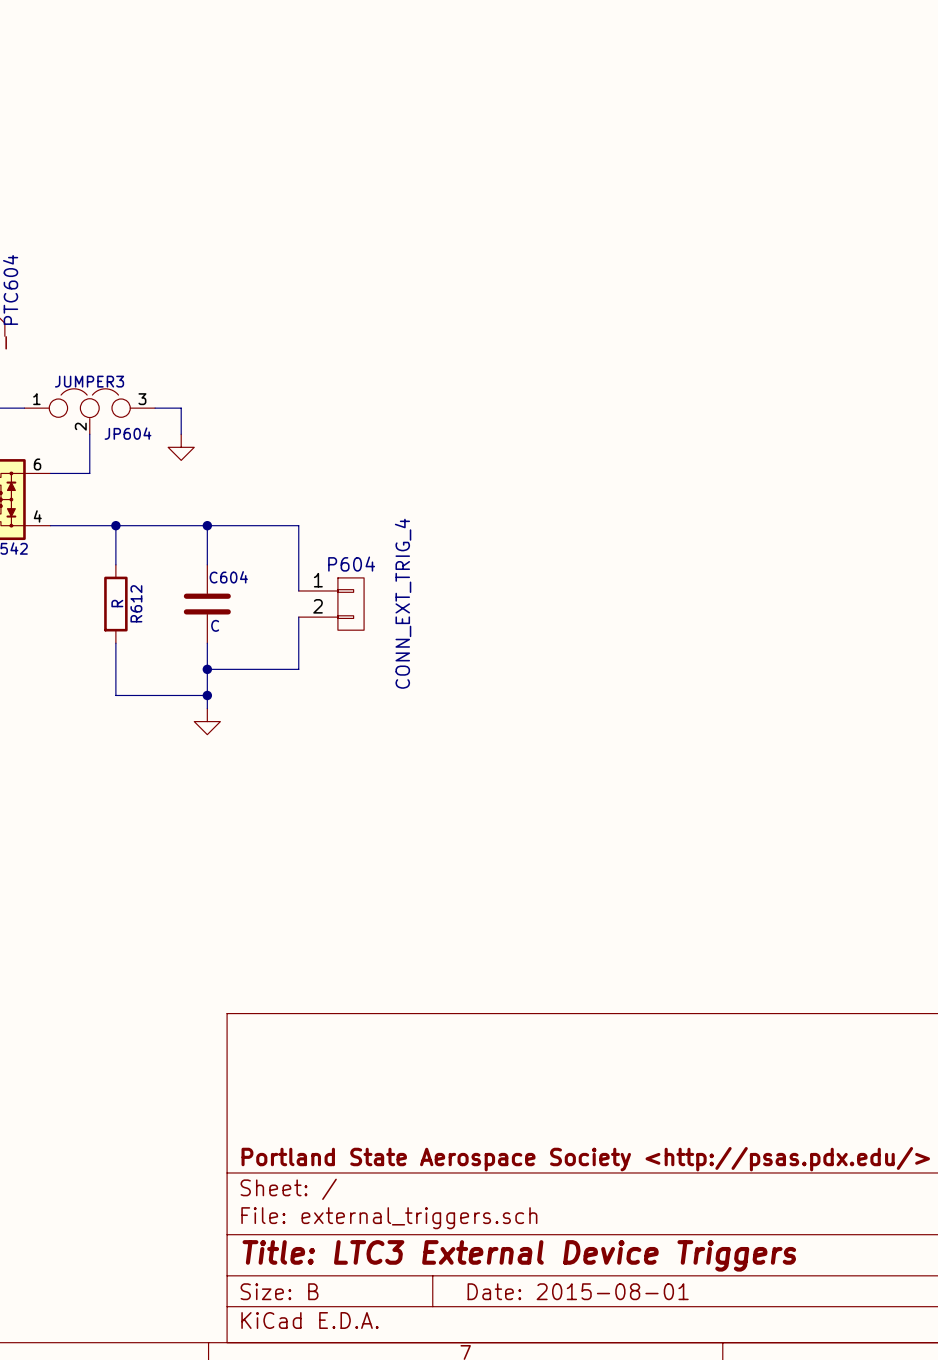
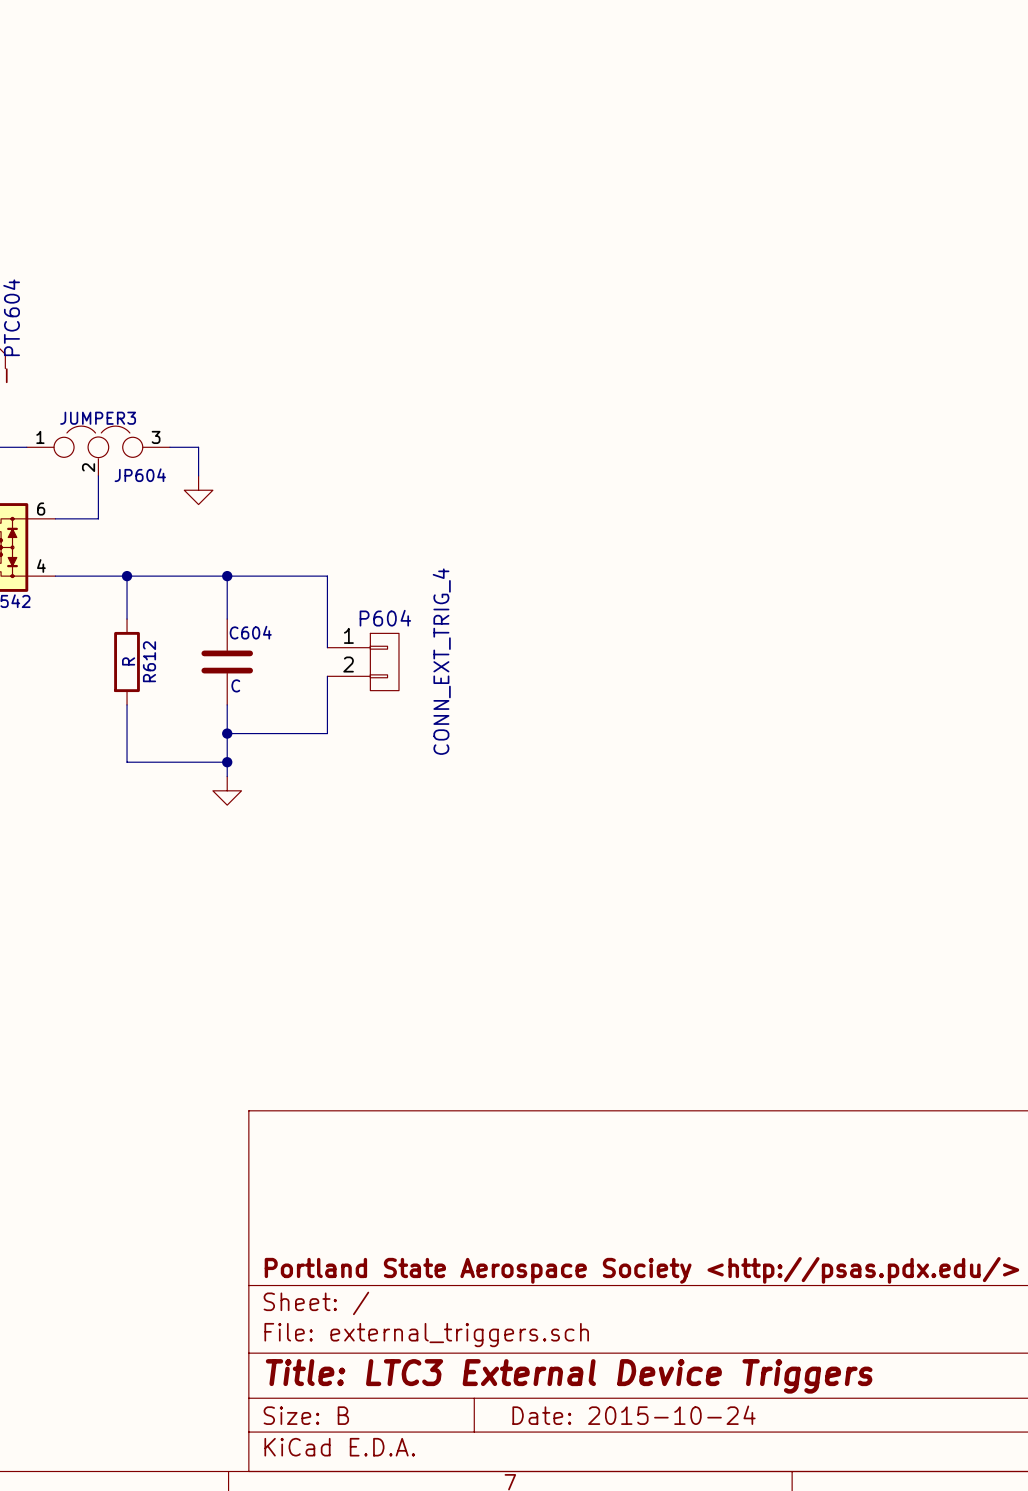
title block: Date: 2015-08-01 (578, 1291) -> Date: 2015-10-24 (634, 1415)

